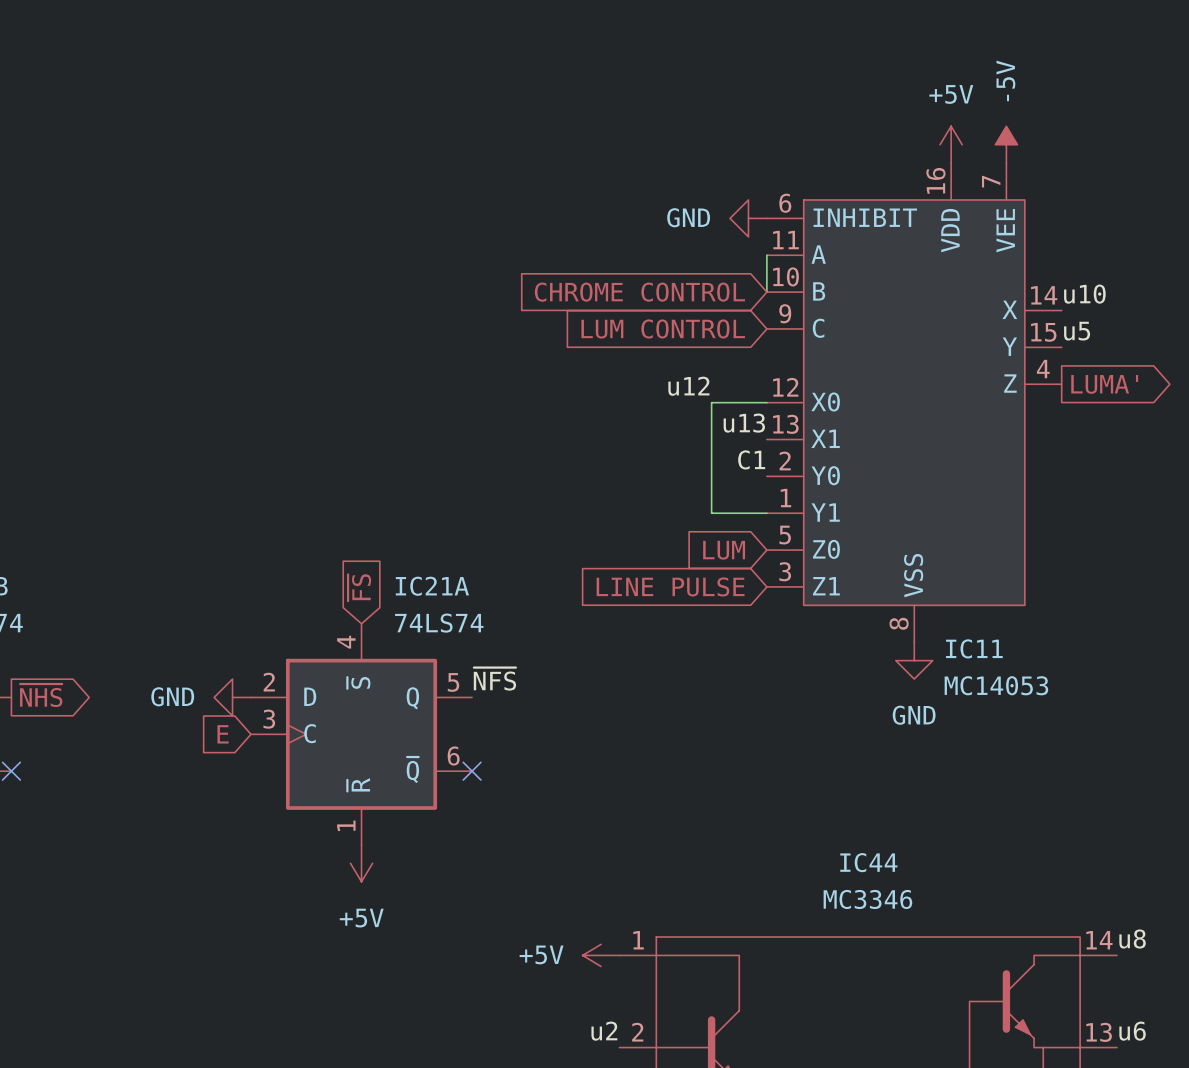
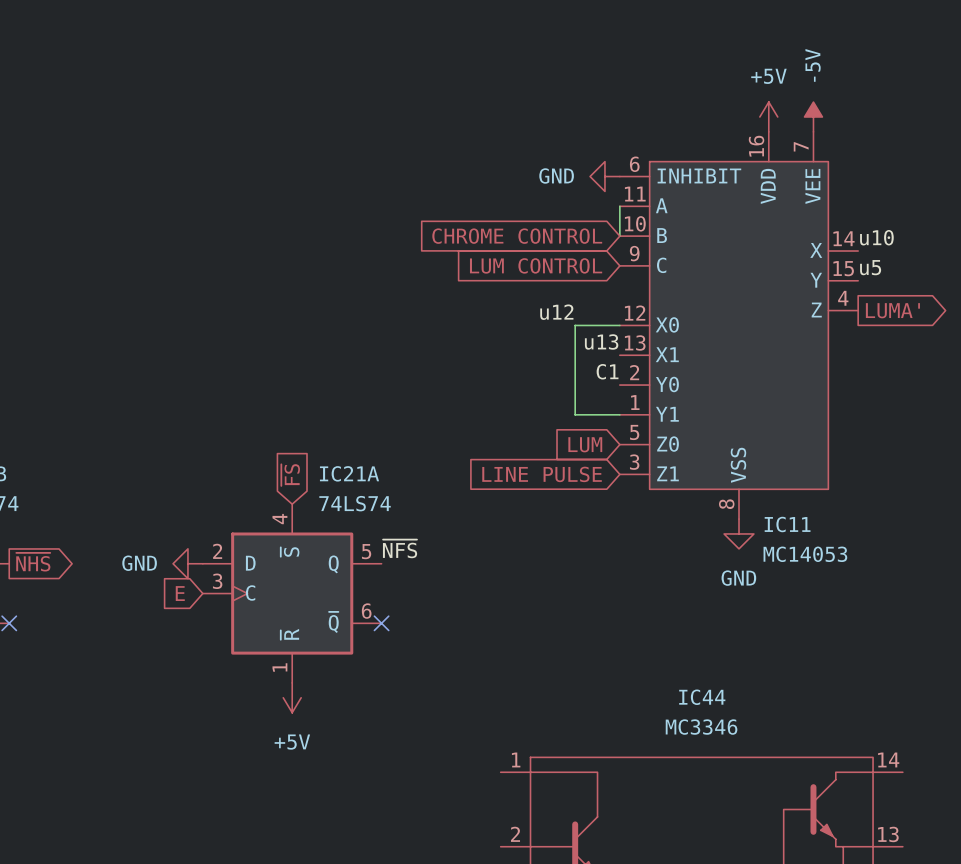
label: u8 (1132, 939) -> none
power symbol: +5V (601, 955) -> none
label: u2 (604, 1031) -> none
label: u6 (1132, 1031) -> none

